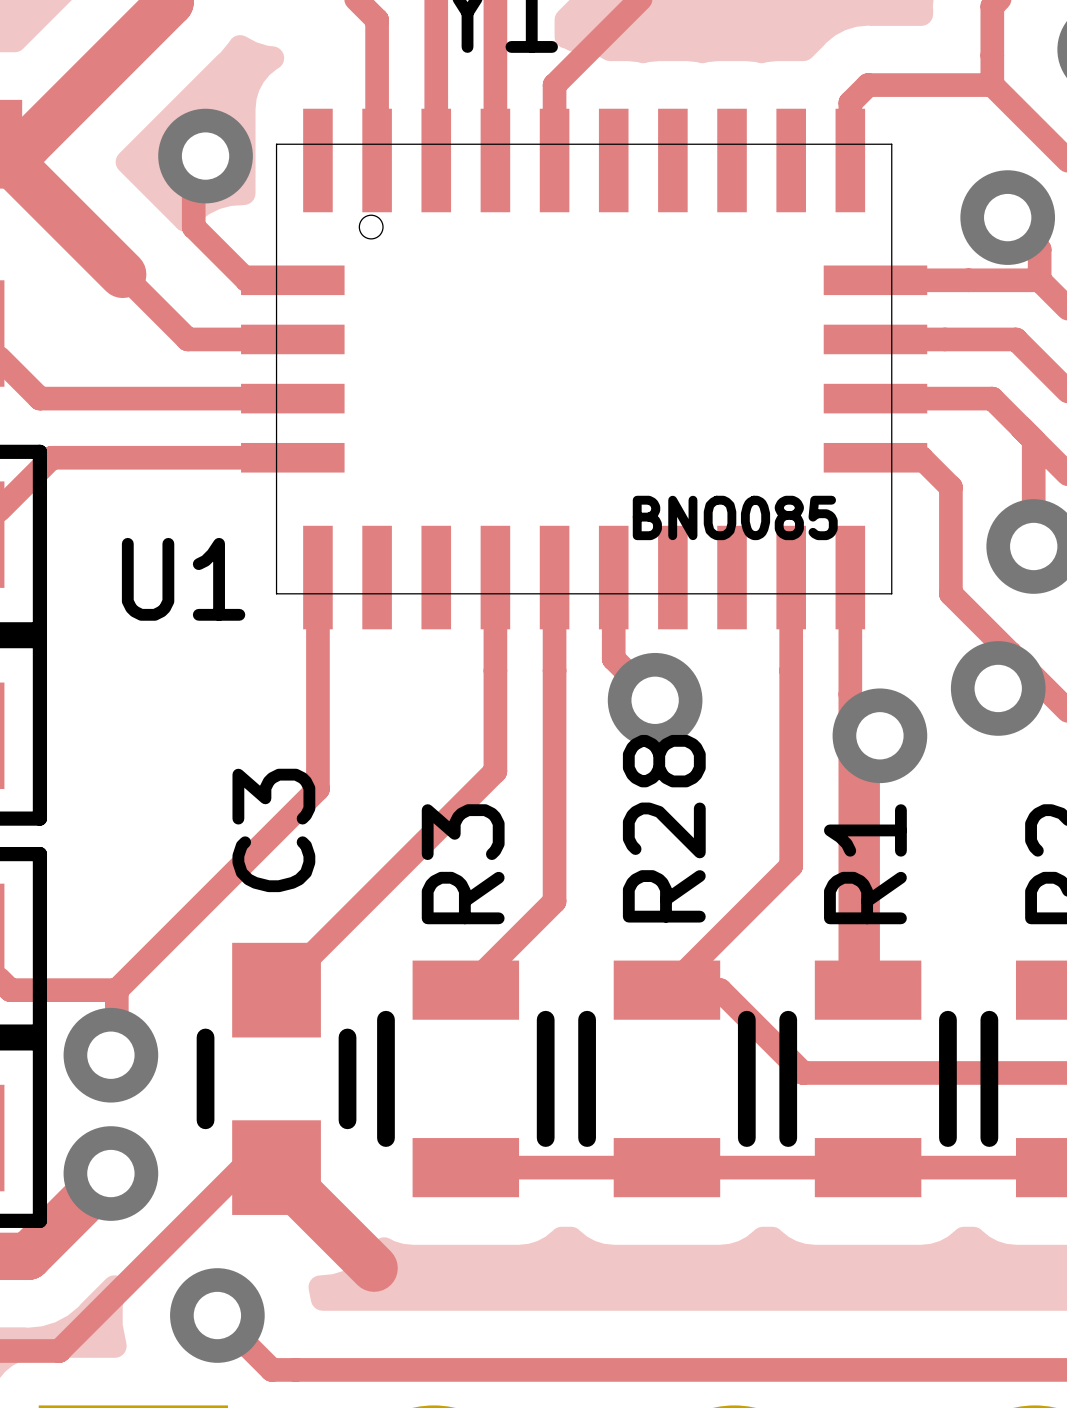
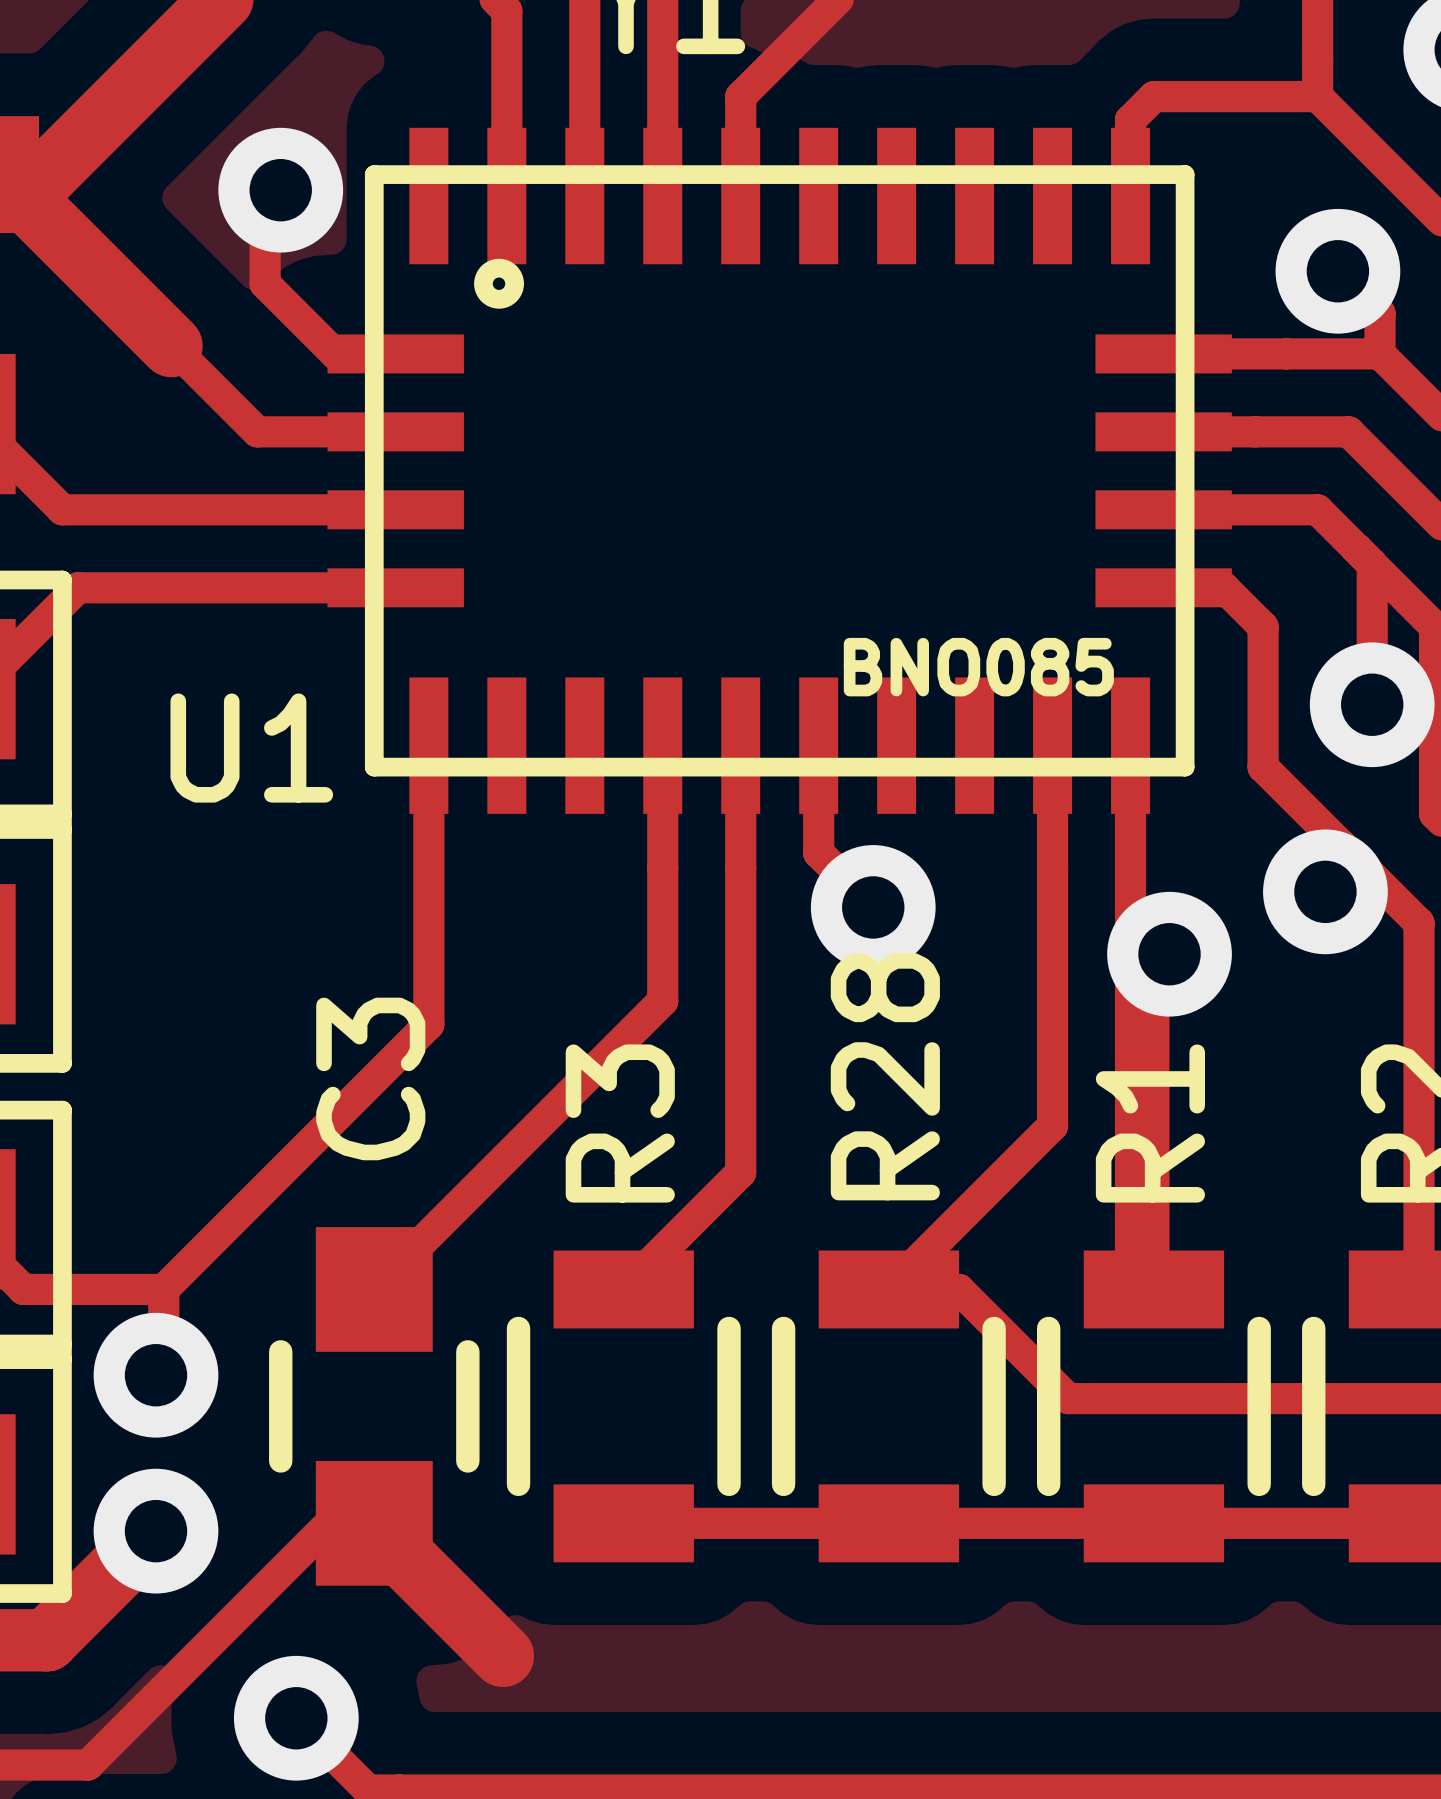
U1 footprint: [241, 108, 928, 630] -> [327, 127, 1232, 814]

